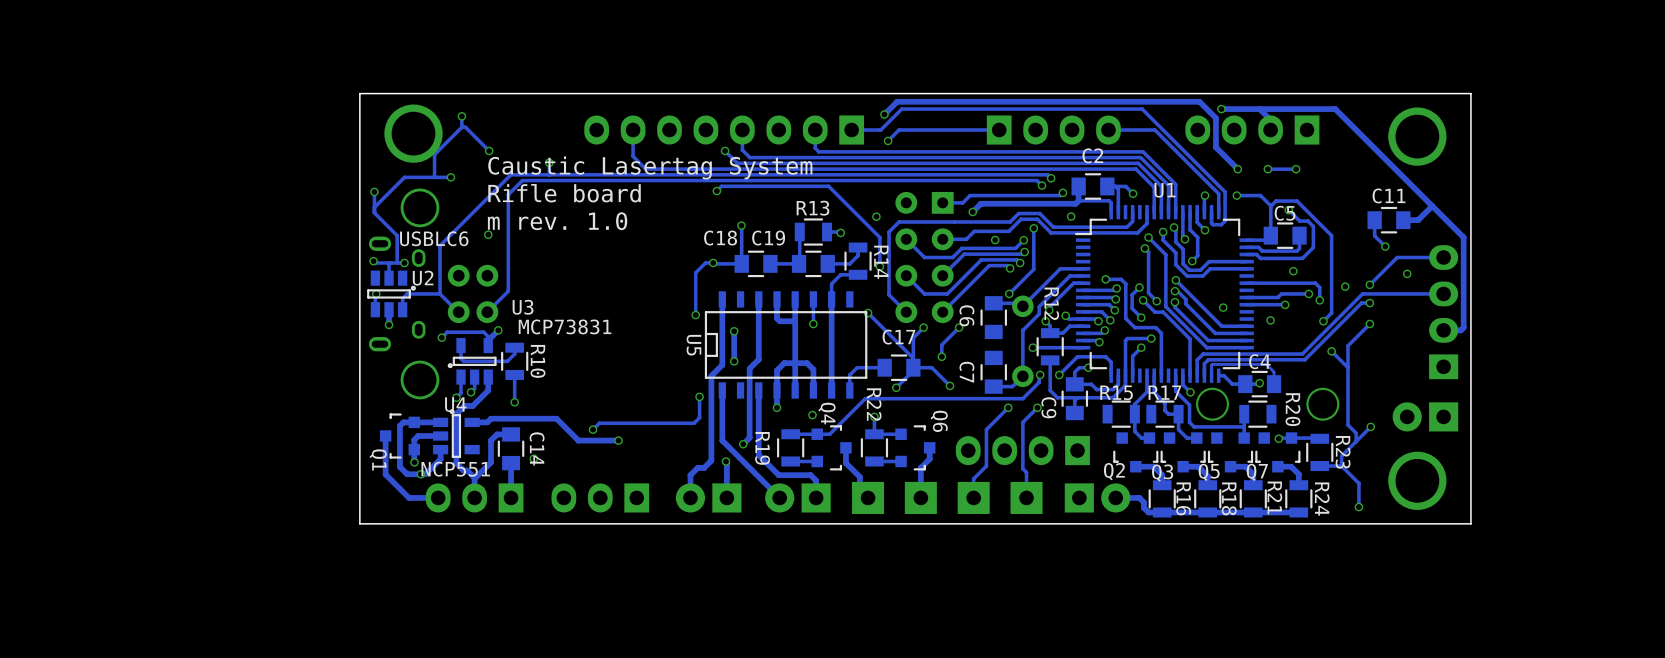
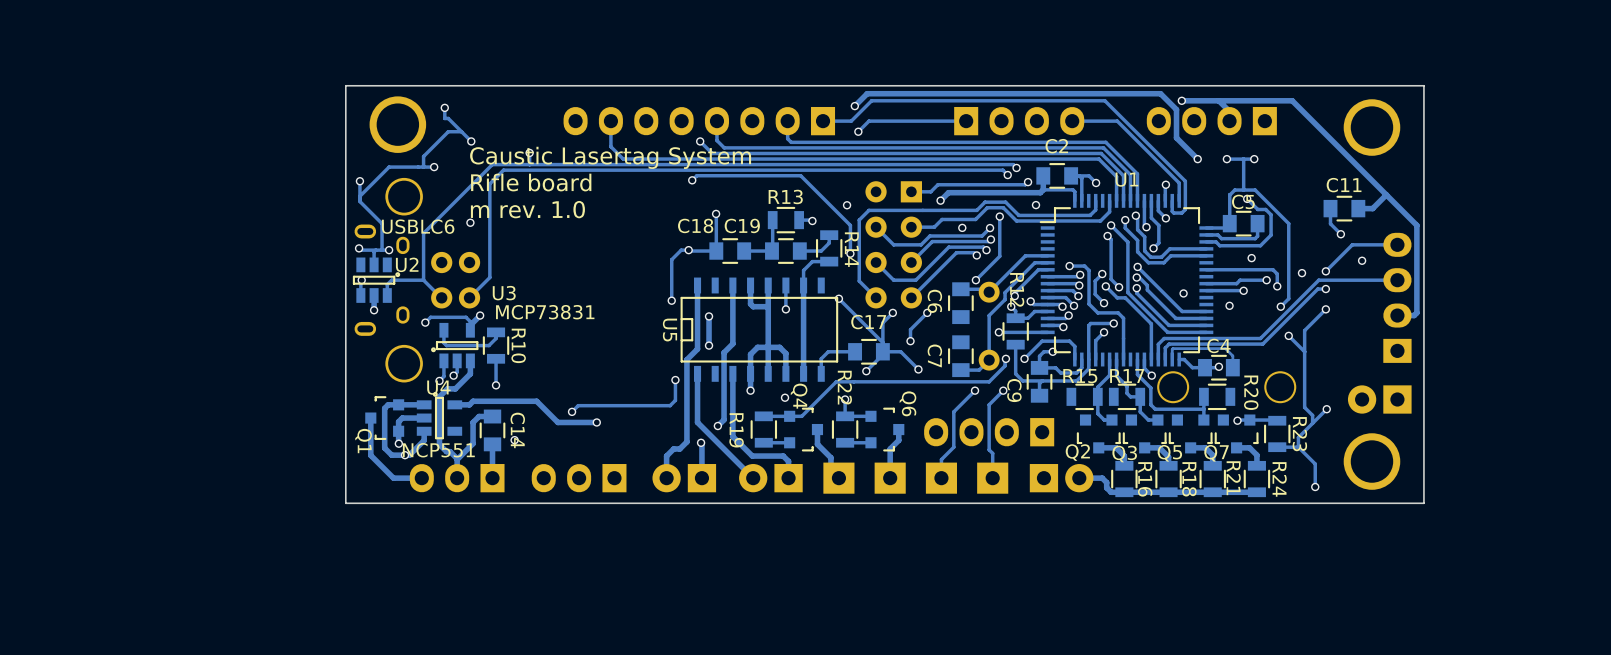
track: (461, 127) (434, 154) (434, 177) -> none
track: none -> (461, 131) (448, 131) (423, 156) (423, 167)
track: none -> (1243, 159) (1243, 190)
track: (1236, 195) (1260, 195) (1270, 205) -> none
via: (1236, 195) -> none

